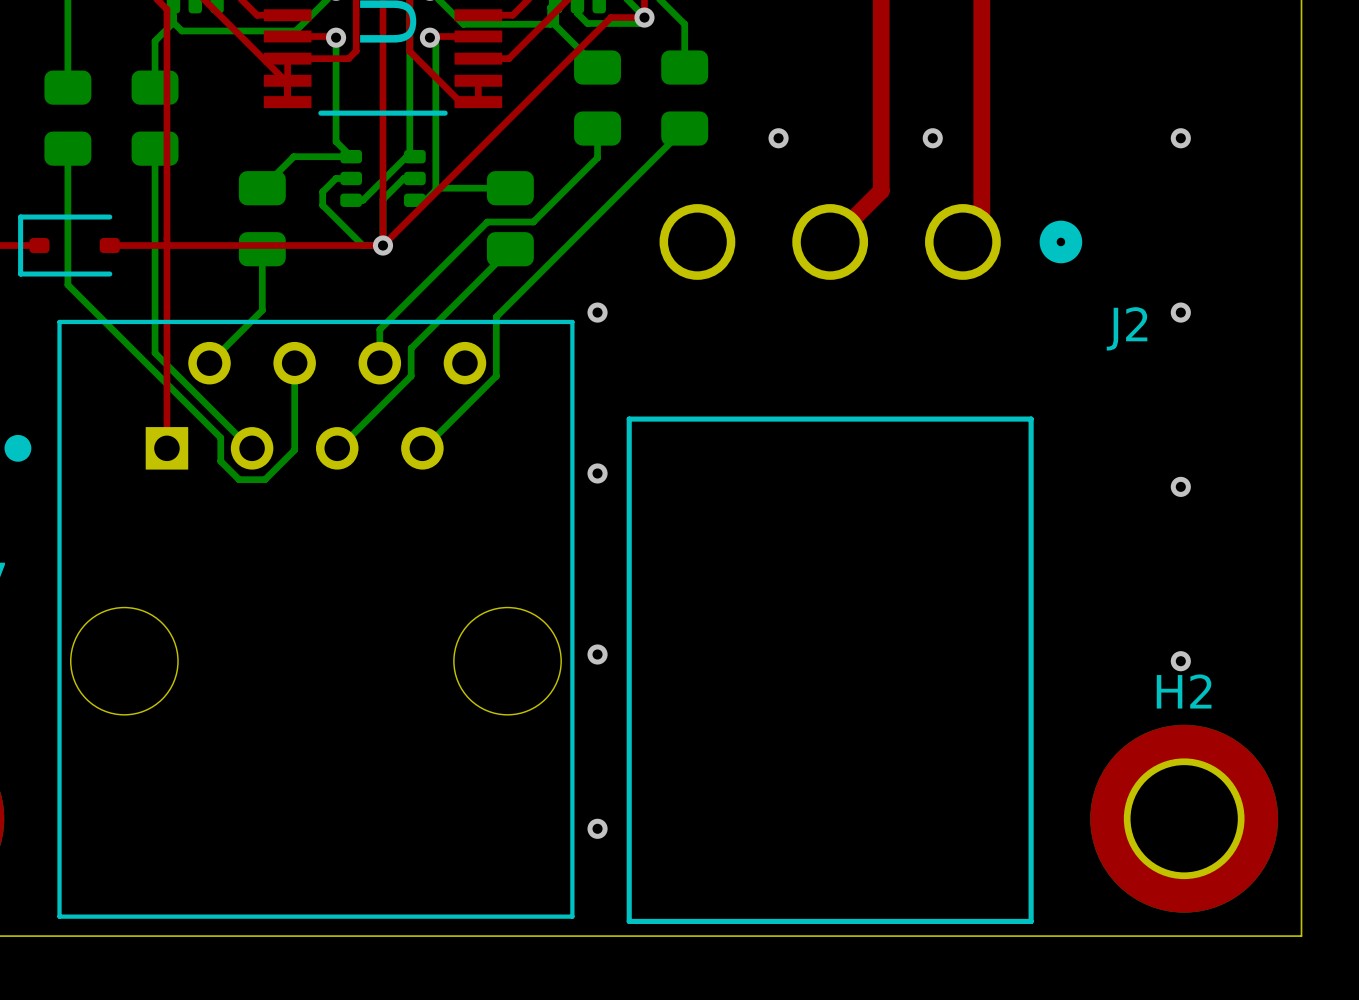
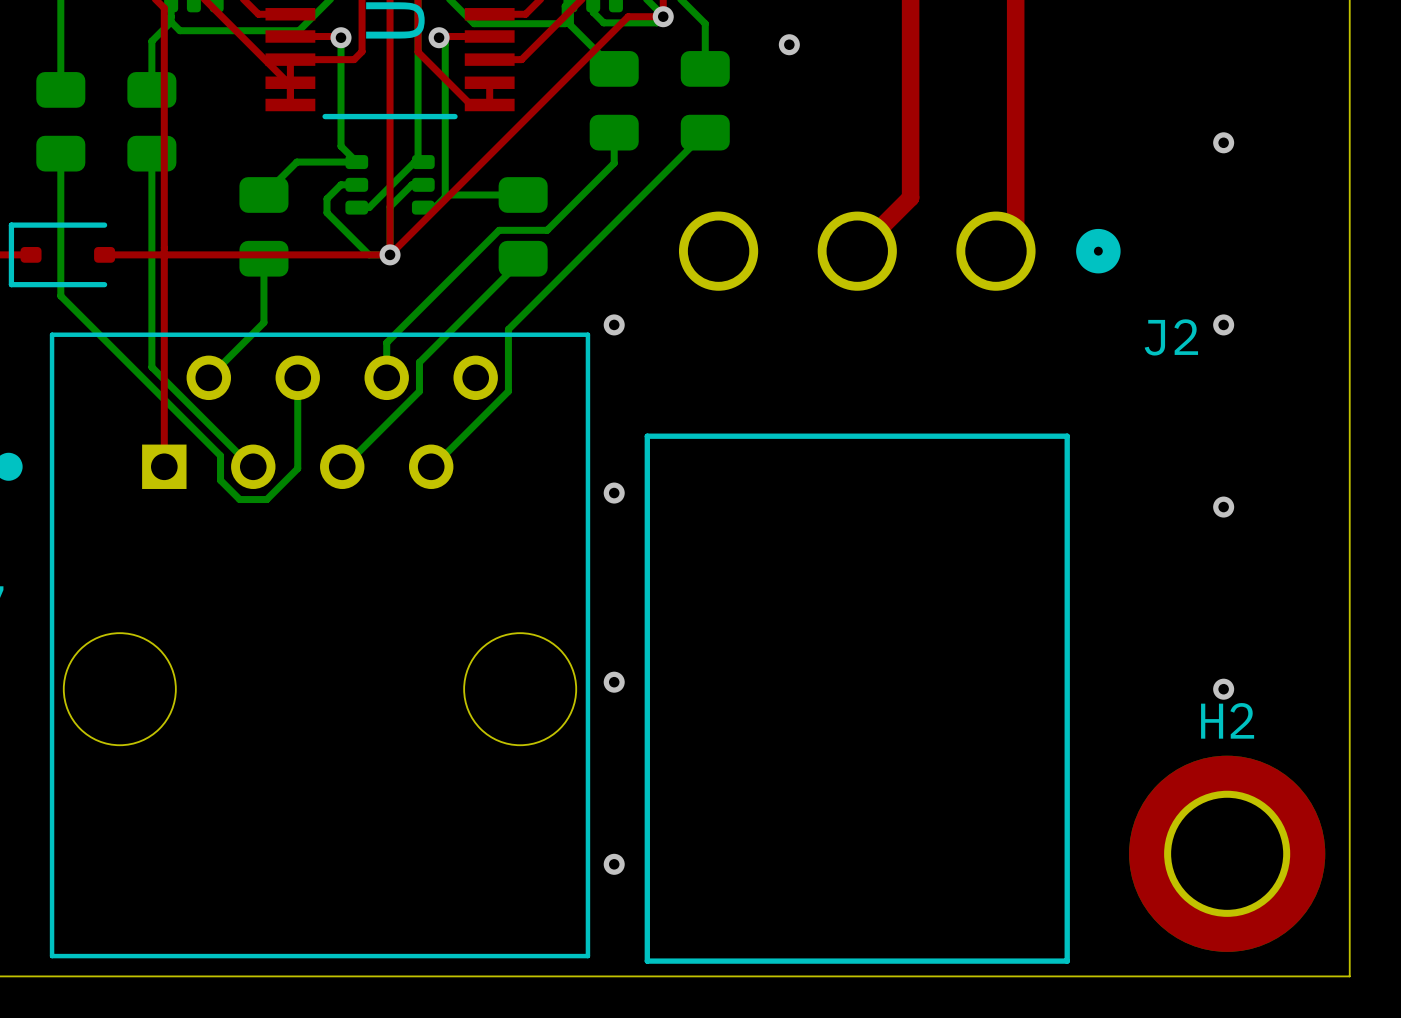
via: none -> (789, 44)
via: (778, 138) -> none
via: (932, 138) -> none

